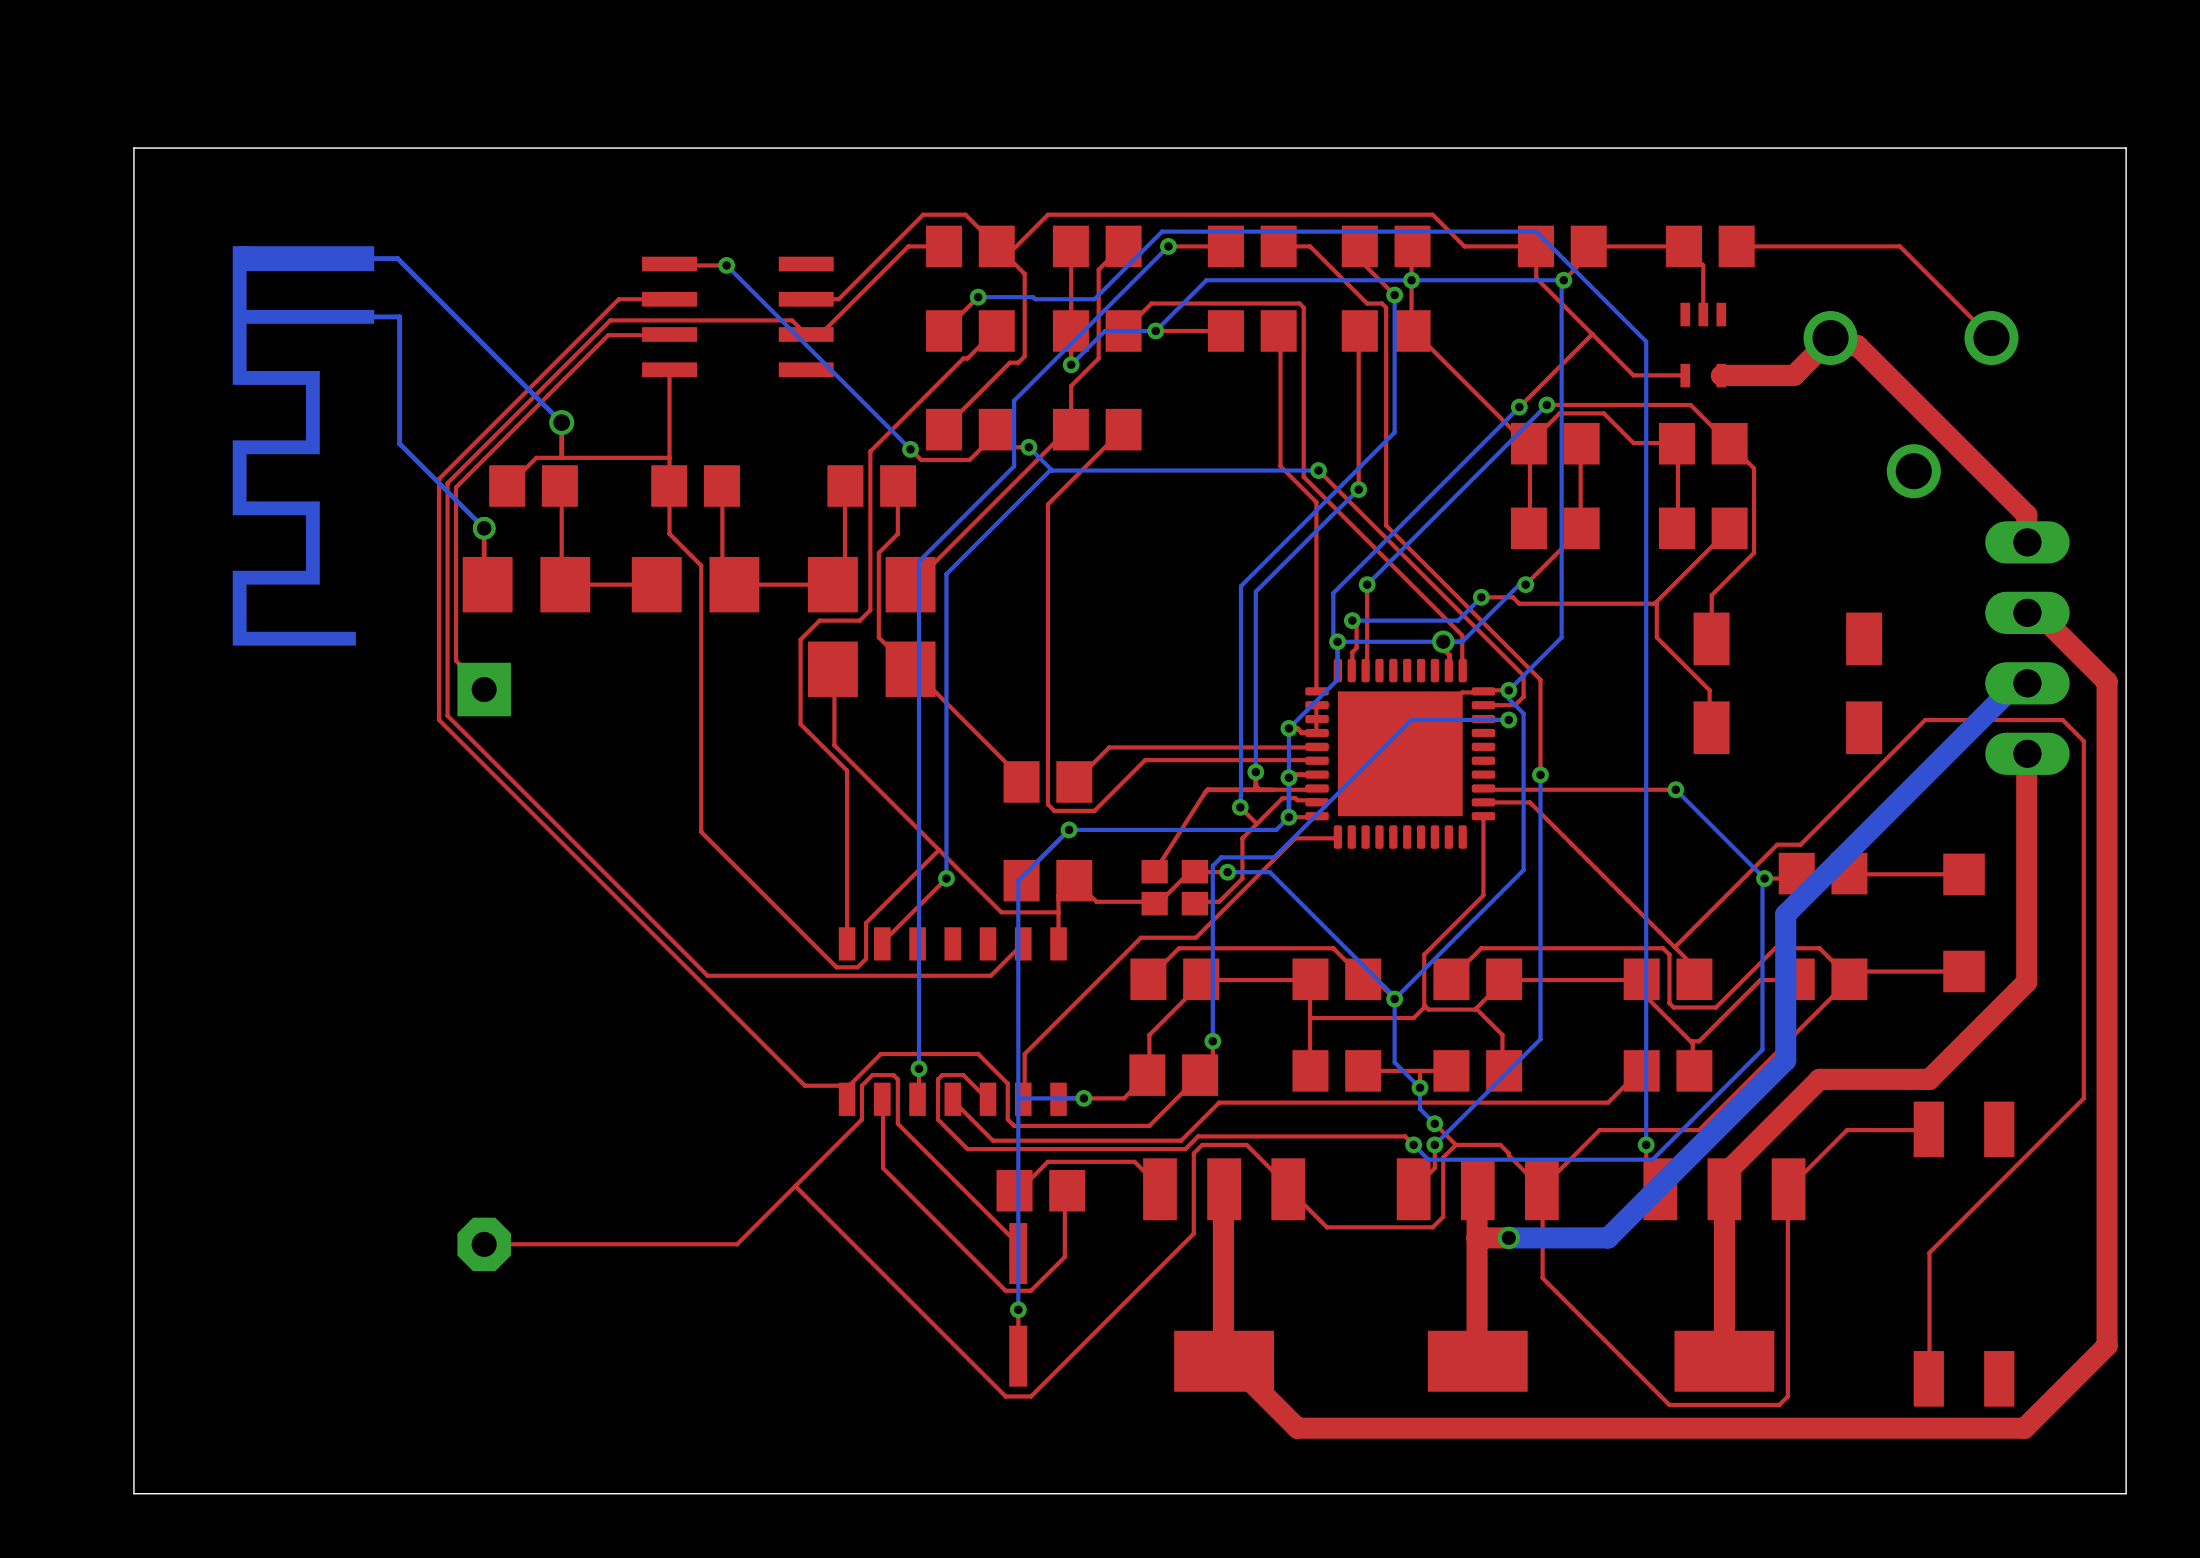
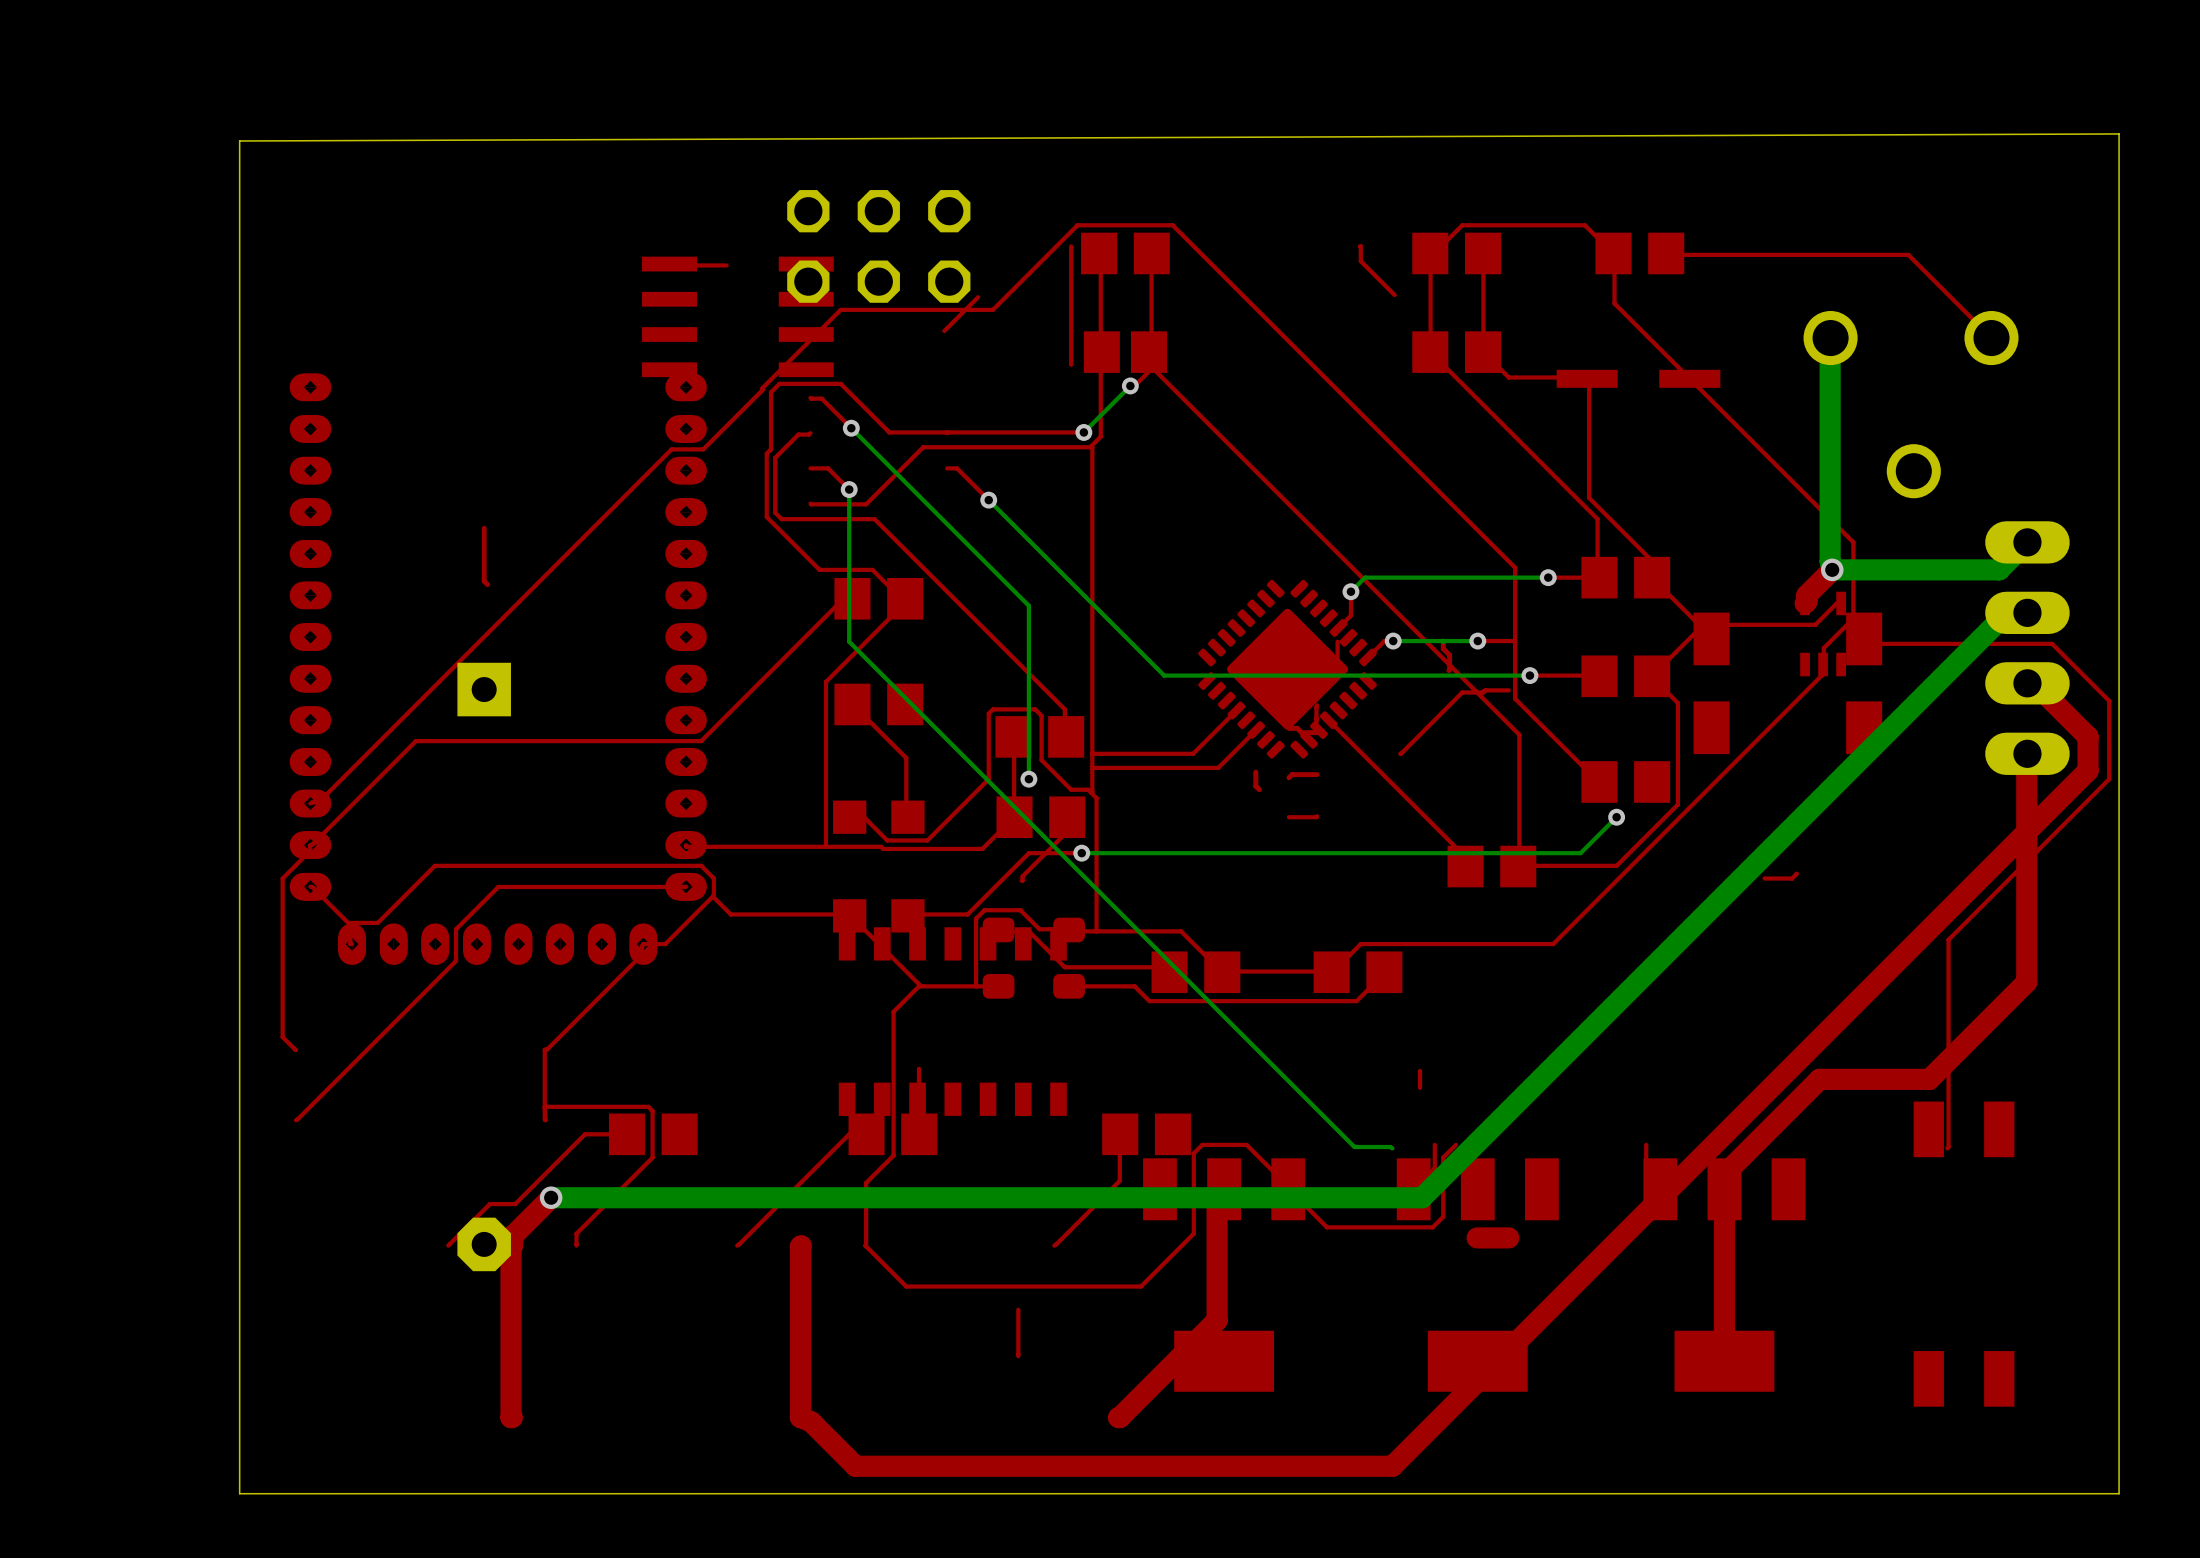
part: none -> (878, 246)
top track: (944, 246) (908, 246) (821, 333) (806, 334) (792, 320) (610, 320) (447, 483) (447, 715) (707, 975) (990, 975) (1023, 943) -> none
part: (970, 246) -> none
top track: (996, 246) (1007, 254) (1047, 214) (1432, 214) (1464, 246) (1536, 246) (1536, 278) (1633, 375) (1685, 375) -> none
part position: (1097, 246) -> (1125, 253)
top track: (1123, 246) (1098, 269) (1098, 358) (1071, 385) (1070, 429) (1069, 428) (910, 584) -> none
bottom track: (1168, 246) (1014, 400) (1014, 466) (918, 561) (918, 1068) -> none
via: (1168, 246) -> none
top track: (1225, 246) (1168, 246) -> none
part: (1252, 246) -> none
top track: (1278, 246) (1310, 246) (1367, 303) (1381, 303) (1386, 307) (1386, 525) (1540, 679) (1540, 774) -> none
part: (1386, 246) -> none
top track: (1412, 246) (1411, 330) (1527, 445) (1528, 443) -> none
part: (1562, 246) -> none
part: (1710, 246) -> none
top track: (1736, 246) (1899, 246) (1908, 254) -> (1666, 253) (1908, 254)
top track: none -> (1099, 253) (1100, 254) (1100, 436) (1090, 447) (1028, 447)
top track: none -> (1151, 253) (1151, 350) (1149, 352)
part: none -> (1456, 253)
top track: none -> (1483, 253) (1483, 352) (1508, 377) (1587, 377) (1589, 379) (1589, 498) (1650, 559) (1650, 576) (1699, 624) (1815, 624) (1836, 603) (1840, 603)
part: none -> (1639, 253)
bottom track: (373, 258) (397, 258) (561, 422) -> none
bottom track: (726, 265) (910, 449) -> none
via: (726, 265) -> none
via: (1411, 280) -> none
bottom track: (1561, 280) (1561, 637) (1508, 690) (1508, 698) (1523, 713) (1523, 870) (1394, 999) -> none
top track: (1563, 280) (1587, 256) (1587, 246) (1684, 246) (1703, 265) (1703, 314) -> none
bottom track: (1563, 280) (1206, 280) (1155, 330) (1105, 330) (1071, 364) -> none
via: (1563, 280) -> none
bottom track: (1394, 295) (1394, 432) (1241, 586) (1240, 807) -> none
via: (1394, 295) -> none
bottom track: (978, 297) (1094, 299) (1162, 231) (1536, 231) (1646, 341) (1646, 1144) -> none
via: (978, 297) -> none
top track: (669, 299) (618, 299) (439, 478) (439, 719) (804, 1085) (847, 1085) (847, 1099) -> none
top track: (806, 299) (838, 299) (923, 214) (965, 214) (1024, 273) (1024, 356) (1018, 362) (1009, 362) (944, 429) -> none
bottom track: (373, 316) (399, 316) (399, 443) (484, 528) -> none
part: (970, 330) -> none
top track: (996, 330) (967, 358) (963, 358) (870, 451) (870, 610) (859, 620) (819, 620) (800, 639) (800, 724) (847, 770) (847, 943) -> none
part: (1097, 330) -> none
top track: (1124, 330) (1151, 303) (1299, 303) (1303, 307) (1303, 476) (1462, 635) (1462, 670) -> none
via: (1155, 330) -> none
top track: (1225, 330) (1155, 330) -> none
part: (1252, 330) -> none
top track: (1278, 330) (1280, 330) (1280, 466) (1316, 502) (1317, 691) -> none
top track: (1359, 330) (1358, 489) -> none
part: (1386, 330) -> none
top track: (669, 334) (608, 335) (456, 487) (456, 660) (484, 689) -> none
top track: (1592, 334) (1519, 407) -> none
bottom track: none -> (1830, 338) (1830, 561) (1832, 569) (1999, 569) (2027, 542)
part rotation: 0° (1703, 345) -> 180° (1823, 634)
part position: (1703, 345) -> (1823, 634)
part: none -> (1125, 352)
part: none -> (1456, 352)
via: (1071, 364) -> none
top track: (669, 369) (669, 533) (701, 565) (701, 832) (836, 967) (857, 967) (866, 958) (866, 922) (939, 849) -> none
top track: (1721, 375) (1794, 375) (1830, 338) (1838, 345) (1857, 345) (2026, 514) (2027, 542) -> none
part: none -> (1638, 378)
top track: none -> (1130, 385) (1134, 385) (1151, 369) (1149, 352) (1151, 352) (1151, 366) (1519, 734) (1518, 866) (1616, 865) (1677, 804) (1677, 703) (1652, 676) (1696, 631) (1698, 623)
bottom track: none -> (1130, 385) (1083, 432)
via: none -> (1130, 385)
top track: none -> (810, 397) (821, 398) (851, 428)
top track: (1546, 404) (1690, 404) (1754, 468) (1754, 552) (1711, 595) (1711, 638) -> none
bottom track: (1546, 404) (1367, 584) -> none
via: (1546, 404) -> none
bottom track: (1519, 407) (1333, 593) (1333, 637) (1337, 641) -> none
via: (1519, 407) -> none
top track: (561, 422) (561, 457) -> none
via: (561, 422) -> none
bottom track: none -> (851, 428) (1028, 605) (1028, 779)
via: none -> (851, 428)
part: (970, 429) -> none
part: (1097, 429) -> none
top track: (1123, 429) (1047, 504) (1047, 804) (1054, 810) (1094, 810) (1145, 760) (1317, 760) -> none
top track: none -> (1083, 432) (889, 432) (840, 383) (779, 383) (770, 392) (770, 449) (766, 453) (766, 517) (819, 569) (872, 569) (902, 599) (905, 598) (904, 603) (825, 681) (825, 846)
via: none -> (1083, 432)
top track: none -> (810, 433) (798, 434) (775, 457) (775, 512) (781, 519) (874, 519) (1064, 709) (1066, 736)
top track: (1528, 443) (1528, 528) -> none
top track: (1528, 443) (1559, 413) (1603, 413) (1633, 443) (1675, 443) (1677, 445) (1676, 528) -> none
part: (1555, 443) -> none
top track: (1581, 443) (1581, 528) (1525, 584) -> none
part: (1703, 443) -> none
part: (303, 445) -> none
top track: none -> (1091, 446) (1091, 792)
top track: (1014, 447) (996, 429) (997, 432) (969, 459) (921, 459) (910, 449) -> (1014, 447) (923, 447) (866, 504) (810, 503)
bottom track: (1028, 447) (1052, 470) (1318, 470) -> none
via: (1028, 447) -> none
via: (910, 449) -> none
top track: (669, 457) (536, 457) (507, 486) -> none
top track: none -> (810, 468) (828, 468) (849, 489)
top track: none -> (947, 468) (957, 468) (988, 500)
bottom track: (1051, 469) (946, 574) (946, 878) -> none
top track: (1318, 470) (1523, 675) (1523, 696) (1515, 705) (1483, 705) -> none
via: (1318, 470) -> none
part: (533, 486) -> none
top track: (559, 486) (561, 487) (561, 582) (563, 584) (656, 584) -> none
part: (695, 486) -> none
top track: (845, 486) (844, 574) (834, 584) (732, 584) (722, 574) (721, 486) -> none
part: (871, 486) -> none
top track: (898, 486) (897, 533) (878, 552) (878, 637) (1020, 777) (1021, 781) -> none
bottom track: none -> (849, 489) (849, 641) (1354, 1147) (1392, 1148)
via: none -> (849, 489)
bottom track: (1358, 489) (1255, 591) (1255, 772) -> none
via: (1358, 489) -> none
bottom track: none -> (988, 500) (1164, 675) (1529, 675)
via: none -> (988, 500)
via: (484, 528) -> none
part: (1555, 528) -> none
part: (1703, 528) -> none
top track: (1729, 528) (1654, 603) (1519, 603) (1513, 597) (1481, 597) -> none
part footprint: [807, 556, 936, 613] -> [834, 577, 924, 620]
top track: none -> (1832, 569) (1806, 595) (1805, 603)
via: none -> (1832, 569)
top track: none -> (1548, 577) (1599, 577) (1597, 576) (1597, 519) (1430, 352) (1430, 253) (1432, 254) (1462, 225) (1584, 225) (1614, 254) (1614, 303) (1853, 542) (1853, 618) (1823, 648) (1821, 675) (1553, 944) (1360, 944) (1331, 972) (1222, 972) (1181, 931) (1069, 931) (1069, 929) (1039, 929) (1020, 910) (984, 910) (976, 918) (976, 986)
bottom track: none -> (1548, 577) (1365, 577) (1350, 591)
part: none -> (1625, 577)
part: (526, 584) -> none
part: (695, 584) -> none
top track: (1367, 584) (1367, 669) (1365, 670) -> none
via position: (1367, 584) -> (1350, 591)
bottom track: (1525, 584) (1519, 584) (1462, 641) (1337, 641) -> none
via position: (1525, 584) -> (1548, 577)
top track: none -> (1350, 591) (1350, 615) (1338, 628)
bottom track: (1481, 597) (1458, 620) (1352, 620) -> none
via: (1481, 597) -> none
top track: none -> (852, 598) (842, 599) (701, 741) (415, 741) (310, 845) (310, 851) (282, 878) (282, 1037) (296, 1049)
top track: (1655, 602) (1656, 637) (1709, 690) (1709, 726) (1711, 727) -> none
top track: (2027, 612) (2039, 614) (2107, 681) (2107, 1345) (2024, 1428) (1297, 1428) (1233, 1364) (1223, 1360) (1224, 1189) -> none
bottom track: none -> (2027, 612) (2005, 614) (1422, 1197) (551, 1197)
top track: none -> (1852, 619) (1876, 643) (2052, 643) (2109, 700) (2109, 779) (1948, 939) (1947, 1148)
top track: (1352, 620) (1356, 624) (1356, 648) (1352, 652) (1351, 670) -> none
via: (1352, 620) -> none
bottom track: (1337, 641) (1337, 679) (1288, 728) (1288, 817) (1276, 829) (1069, 829) (1018, 880) (1018, 1309) -> none
via: (1337, 641) -> none
top track: none -> (1393, 641) (1384, 641) (1367, 657)
via: none -> (1393, 641)
via: (1443, 641) -> none
bottom track: none -> (1477, 641) (1393, 641)
via: none -> (1477, 641)
top track: none -> (1515, 641) (1477, 641)
part: none -> (498, 669)
top track: (832, 669) (834, 745) (1001, 912) (1058, 912) -> none
part: (871, 669) -> none
part: none -> (1287, 669)
top track: none -> (1529, 675) (1599, 676)
via: none -> (1529, 675)
part: none -> (1625, 676)
top track: none -> (2027, 683) (2035, 684) (2088, 736) (2088, 770) (1392, 1466) (855, 1466) (811, 1421) (800, 1417) (801, 1245)
bottom track: (2027, 683) (2016, 684) (1785, 914) (1785, 1060) (1608, 1237) (1508, 1237) -> none
via: (1508, 690) -> none
top track: none -> (852, 704) (906, 758) (906, 817) (907, 817)
part: none -> (878, 704)
top track: none -> (1236, 710) (1193, 753) (1092, 753)
bottom track: (1508, 719) (1411, 719) (1274, 857) (1221, 857) (1212, 865) (1212, 1041) -> none
via: (1508, 719) -> none
top track: none -> (1328, 720) (1465, 857) (1465, 866)
via: (1288, 728) -> none
top track: none -> (1256, 730) (1218, 767) (1092, 767)
top track: none -> (1013, 736) (1014, 817) (982, 848) (686, 846) (686, 845)
part: none -> (1039, 736)
top track: (1317, 746) (1109, 747) (1074, 781) -> none
part: (1400, 753) -> none
via: (1255, 772) -> none
bottom track: (1540, 774) (1540, 1039) (1434, 1144) -> none
via: (1540, 774) -> none
via: (1288, 777) -> none
via: none -> (1028, 779)
part: (1047, 781) -> none
top track: none -> (1599, 781) (1515, 698) (1515, 567) (1172, 225) (1077, 225) (992, 309) (840, 309) (703, 449) (671, 449) (318, 802) (310, 803)
part: none -> (1625, 781)
top track: (1317, 788) (1207, 789) (1154, 871) -> none
top track: (1483, 788) (1675, 789) -> none
bottom track: (1675, 789) (1764, 878) (1762, 878) (1762, 1049) (1652, 1159) (1428, 1159) (1413, 1144) -> none
via: (1675, 789) -> none
top track: (1317, 802) (1316, 800) (1282, 798) (1242, 838) (1242, 878) (1219, 901) (1195, 901) (1194, 903) -> none
top track: (1483, 802) (1529, 802) (1692, 965) (1692, 977) (1694, 979) -> none
top track: (1240, 807) (1256, 823) -> none
via: (1240, 807) -> none
top track: (1483, 816) (1483, 895) (1424, 954) (1424, 1005) (1428, 1009) (1474, 1009) (1504, 979) (1641, 979) (1641, 992) (1692, 1043) (1692, 1070) (1694, 1070) -> none
top track: none -> (849, 817) (864, 817) (887, 840) (927, 840) (988, 779) (988, 713) (992, 709) (1035, 709) (1041, 715) (1041, 760) (1071, 789) (1088, 789) (1096, 798) (1096, 931)
part: none -> (878, 817)
part: none -> (1040, 817)
via: (1288, 817) -> none
bottom track: none -> (1616, 817) (1580, 853) (1081, 853)
via: none -> (1616, 817)
via position: (1069, 829) -> (1081, 853)
top track: (1337, 837) (1295, 838) (1195, 937) (1140, 937) (1024, 1053) (1023, 1099) -> none
top track: none -> (1081, 853) (1028, 853) (967, 914) (907, 915)
part: none -> (1491, 866)
top track: (1227, 872) (1189, 872) (1159, 901) (1154, 903) (1153, 901) (1096, 901) (1073, 880) (1058, 895) (1058, 943) -> none
bottom track: (1227, 872) (1269, 872) (1394, 996) (1394, 1062) (1420, 1087) (1420, 1108) (1434, 1123) -> none
via: (1227, 872) -> none
part: (1823, 873) -> none
top track: (1849, 873) (1964, 874) -> none
top track: (946, 878) (882, 943) -> none
via: (946, 878) -> none
via: (1764, 878) -> none
part: (1047, 880) -> none
top track: none -> (310, 886) (350, 925) (350, 944) (352, 944)
top track: none -> (686, 886) (498, 886) (456, 929) (456, 960) (296, 1120)
part: (1174, 887) -> none
top track: none -> (712, 896) (730, 914) (849, 914) (921, 986) (998, 986)
part: none -> (878, 915)
part: (1964, 922) -> none
top track: none -> (349, 923) (377, 922) (434, 865) (701, 865) (713, 878) (713, 895) (665, 944) (643, 944) (642, 954) (544, 1049) (544, 1119) (545, 1120) (544, 1106) (648, 1106) (652, 1111) (652, 1157) (576, 1233) (576, 1245)
top track: none -> (998, 929) (1028, 931) (1064, 967) (1164, 967) (1169, 972)
top track: (1674, 947) (1777, 844) (1800, 844) (1925, 719) (2062, 719) (2083, 741) (2083, 1098) (1929, 1252) (1928, 1378) -> none
part: none -> (1033, 958)
top track: (1964, 971) (1857, 971) (1849, 979) -> none
top track: none -> (1384, 972) (1356, 1001) (1149, 1001) (1134, 986) (1069, 986)
top track: (1148, 979) (1179, 948) (1333, 948) (1363, 979) (1375, 980) (1394, 999) -> none
part position: (1174, 979) -> (1195, 972)
part position: (1336, 979) -> (1357, 972)
part: (1477, 979) -> none
part: (1668, 979) -> none
top track: (1796, 979) (1760, 980) (1699, 1041) (1691, 1042) -> none
part: (1823, 979) -> none
top track: (1849, 979) (1819, 948) (1775, 948) (1715, 1007) (1673, 1007) (1669, 1003) (1669, 954) (1663, 948) (1481, 948) (1451, 979) -> none
top track: (1849, 979) (1699, 1130) (1599, 1130) (1541, 1189) -> none
via: (1394, 999) -> none
top track: (1425, 1006) (1413, 1018) (1310, 1018) -> none
top track: (1476, 1008) (1502, 1034) (1502, 1070) (1504, 1070) -> none
top track: (1212, 1041) (1212, 1062) (1149, 1125) (1014, 1125) (1007, 1119) (1007, 1083) (978, 1053) (880, 1053) (847, 1087) -> none
via: (1212, 1041) -> none
via: (918, 1068) -> none
top track: (1310, 1070) (1310, 979) (1201, 979) (1202, 982) (1149, 1034) (1149, 1075) (1124, 1098) (1058, 1099) -> none
part: (1336, 1070) -> none
top track: (1451, 1070) (1363, 1070) -> none
part: (1477, 1070) -> none
top track: (1641, 1070) (1608, 1102) (1219, 1102) (1181, 1140) (992, 1140) (952, 1099) -> none
part: (1668, 1070) -> none
part: (1173, 1075) -> none
via: (1420, 1087) -> none
bottom track: (1083, 1098) (1018, 1098) -> none
via: (1083, 1098) -> none
top track: (882, 1099) (883, 1168) (1005, 1290) (1031, 1290) (1064, 1256) (1064, 1193) (1067, 1190) -> none
top track: (988, 1099) (963, 1075) (942, 1075) (938, 1079) (938, 1119) (967, 1149) (1185, 1149) (1198, 1136) (1405, 1136) (1413, 1144) -> none
top track: (1434, 1123) (1455, 1144) (1500, 1144) (1541, 1189) -> none
via: (1434, 1123) -> none
top track: (1928, 1129) (1847, 1130) (1787, 1189) (1787, 1396) (1779, 1404) (1669, 1404) (1542, 1278) (1541, 1189) -> none
top track: none -> (626, 1134) (584, 1134) (515, 1204) (489, 1204) (448, 1245)
part: none -> (653, 1134)
top track: none -> (866, 1134) (849, 1134) (737, 1245)
part: none -> (892, 1134)
top track: none -> (1119, 1134) (1119, 1180) (1054, 1245)
part: none -> (1146, 1134)
via: (1413, 1144) -> none
via: (1434, 1144) -> none
via: (1646, 1144) -> none
top track: (795, 1186) (1005, 1396) (1031, 1396) (1140, 1286) -> (920, 985) (893, 1011) (893, 1155) (866, 1182) (865, 1245) (906, 1286) (1140, 1286)
top track: (1159, 1189) (1134, 1161) (1047, 1161) (1020, 1189) (1014, 1190) -> none
top track: (1477, 1189) (1477, 1361) -> none
part: (1040, 1190) -> none
top track: none -> (551, 1197) (513, 1235) (510, 1246) (512, 1417)
via: none -> (551, 1197)
top track: none -> (1217, 1206) (1217, 1320) (1118, 1417)
via: (1508, 1237) -> none
top track: (484, 1244) (737, 1244) (861, 1119) (861, 1085) (872, 1075) (893, 1075) (897, 1079) (897, 1123) (1016, 1242) (1016, 1252) (1018, 1253) -> none
part: (1018, 1304) -> none
via: (1018, 1309) -> none
board edge: (2119, 1493) (2126, 1493) (2126, 148) (133, 148) (133, 1493) (239, 1493) -> (2119, 1493) (2119, 133) (239, 141) (239, 1493)

